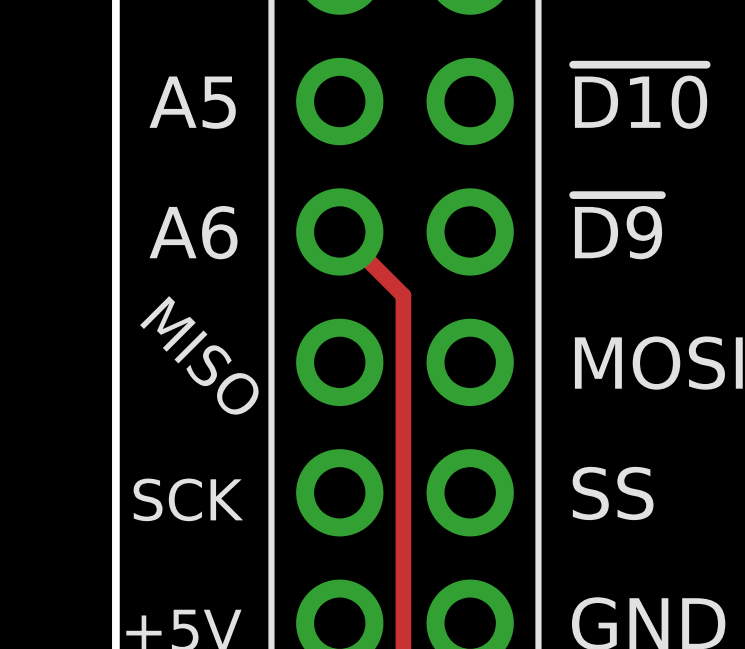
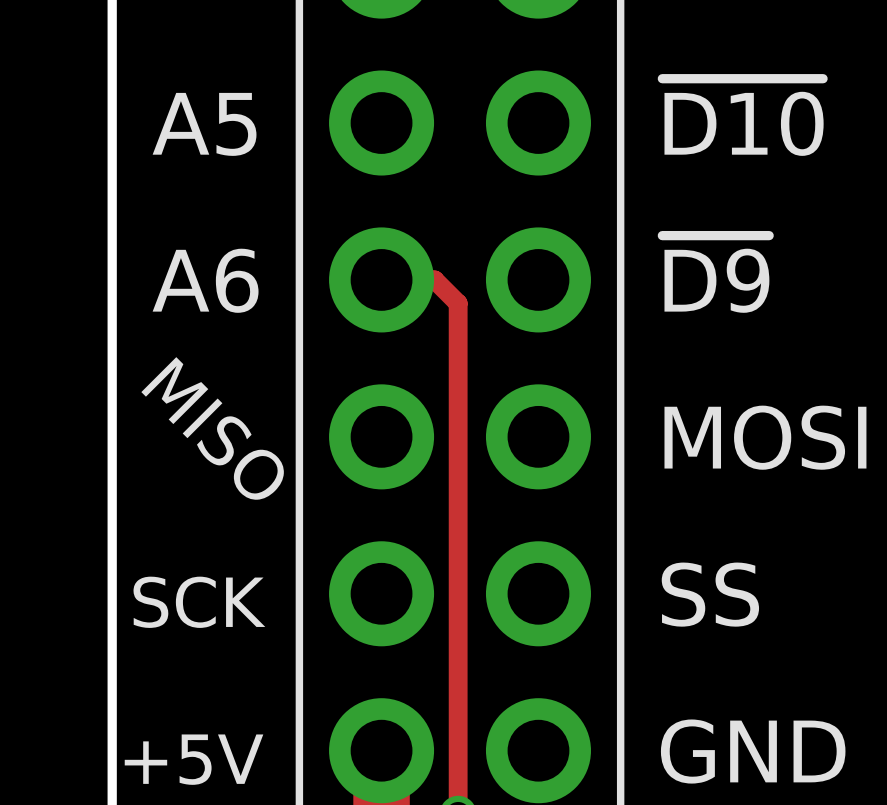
track: (339, 231) (403, 295) -> (381, 279) (434, 279) (458, 303) (458, 356)

